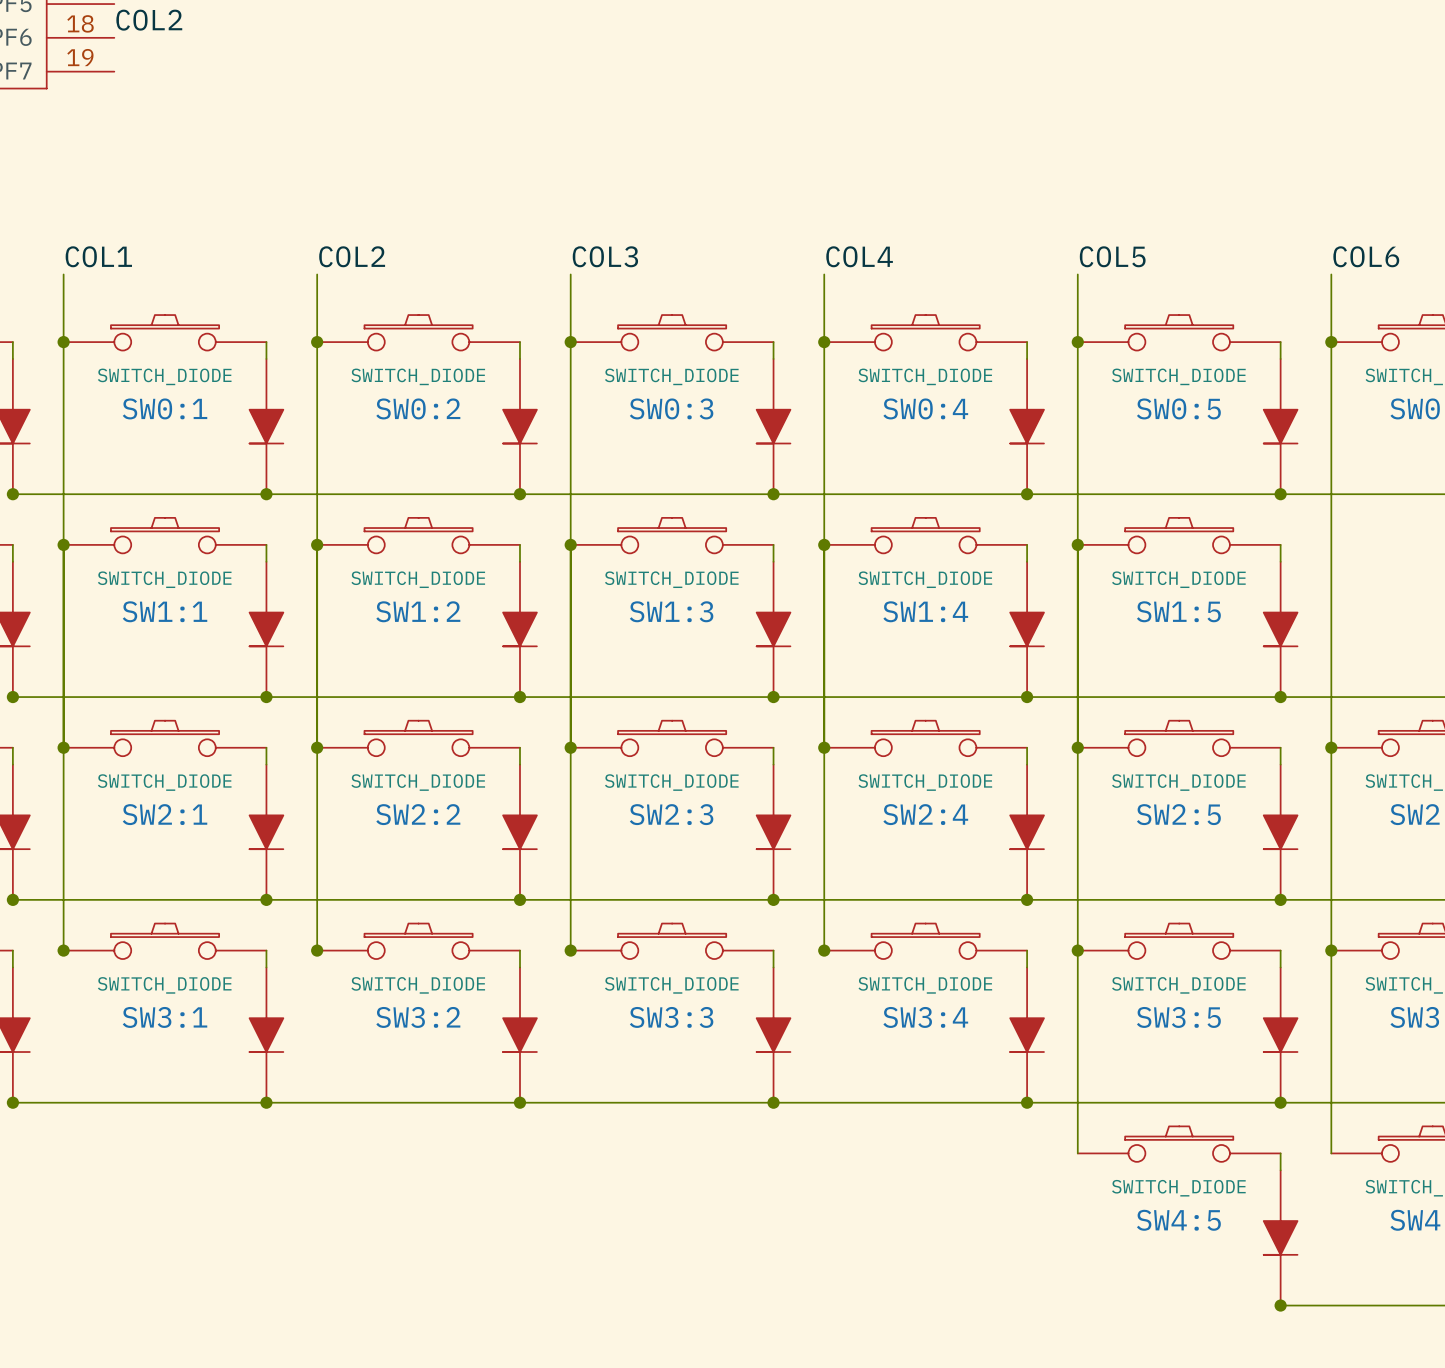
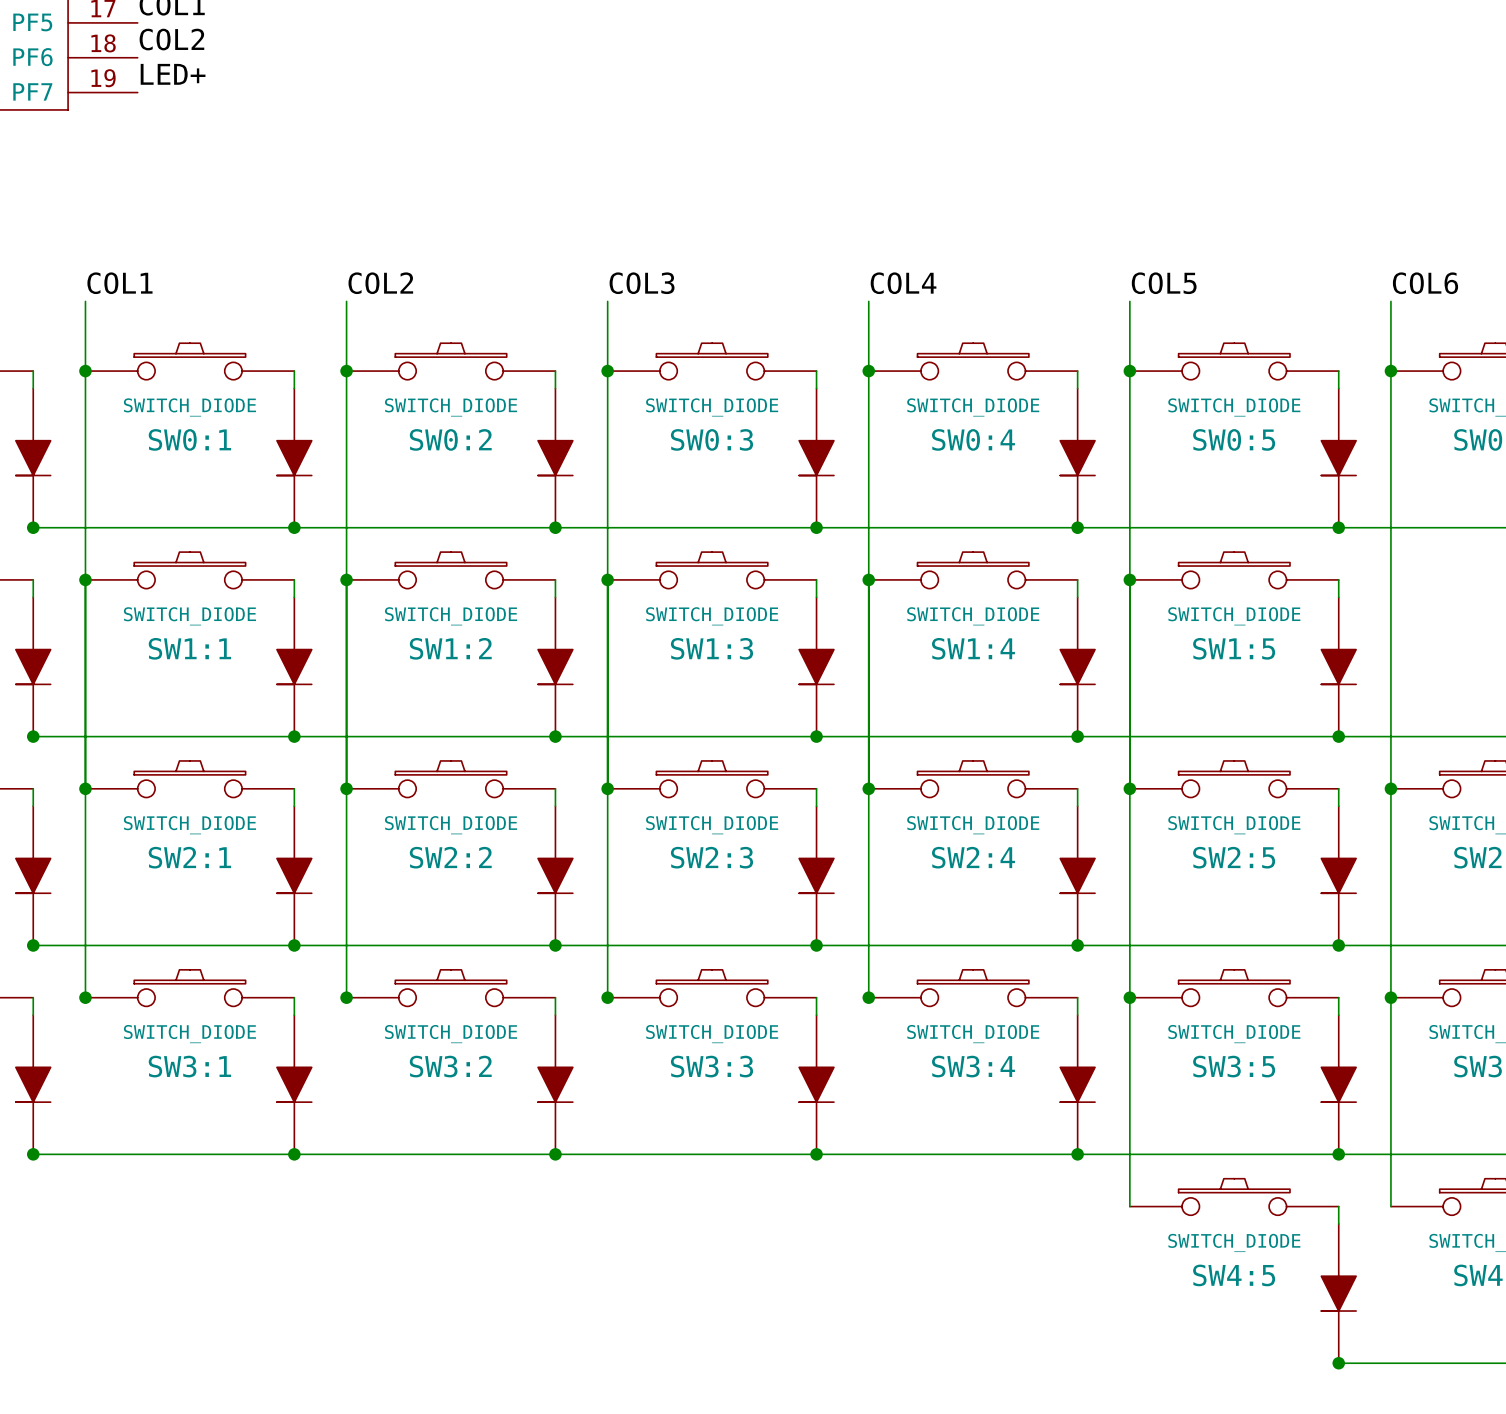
label: none -> LED+ (173, 74)

